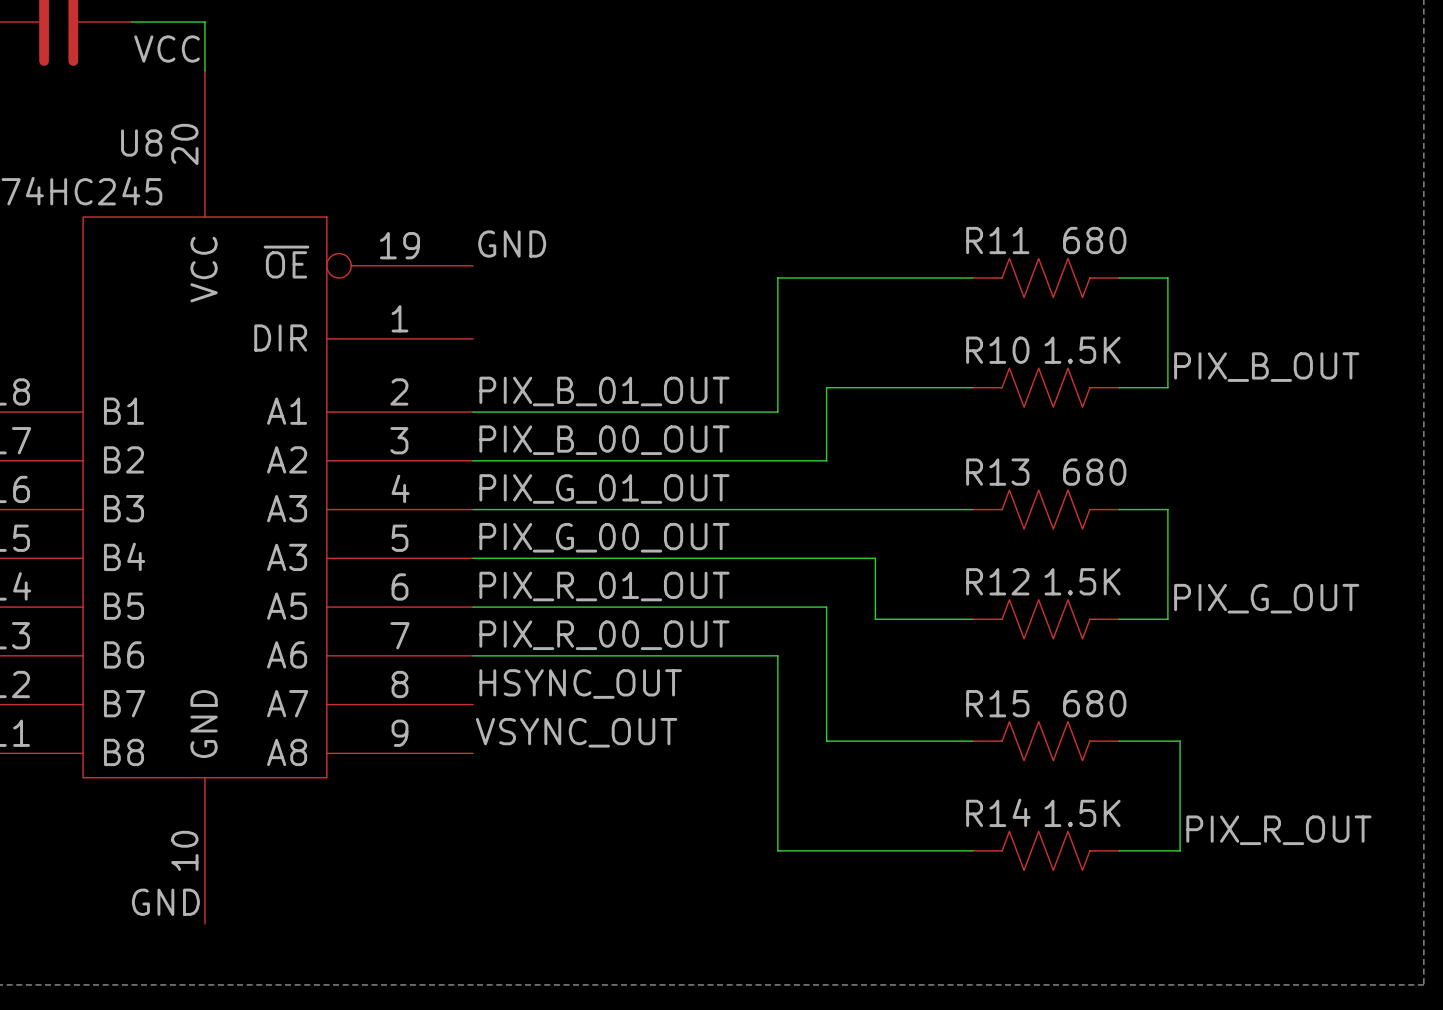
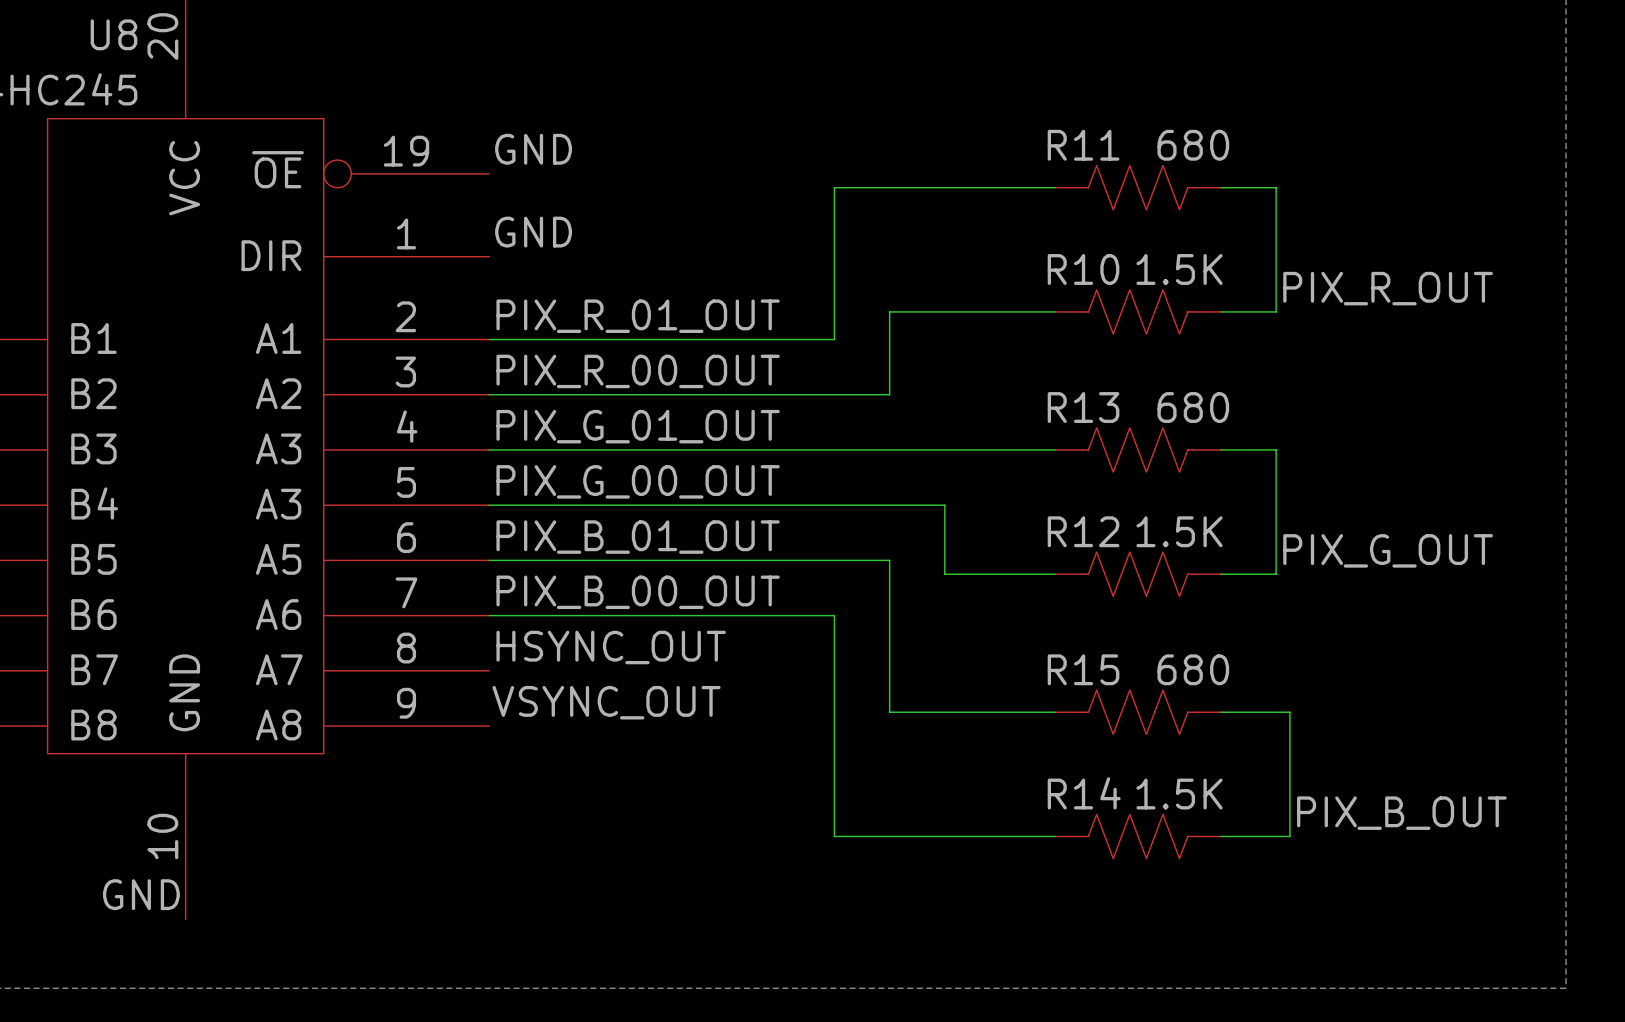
label: none -> GND (533, 232)
label: PIX_B_OUT (1266, 367) -> PIX_R_OUT (1388, 288)
label: PIX_B_01_OUT (604, 391) -> PIX_R_01_OUT (638, 316)
label: PIX_B_00_OUT (604, 440) -> PIX_R_00_OUT (638, 371)
label: PIX_R_01_OUT (604, 586) -> PIX_B_01_OUT (638, 537)
label: PIX_R_00_OUT (604, 635) -> PIX_B_00_OUT (638, 592)
label: PIX_R_OUT (1278, 830) -> PIX_B_OUT (1401, 813)

